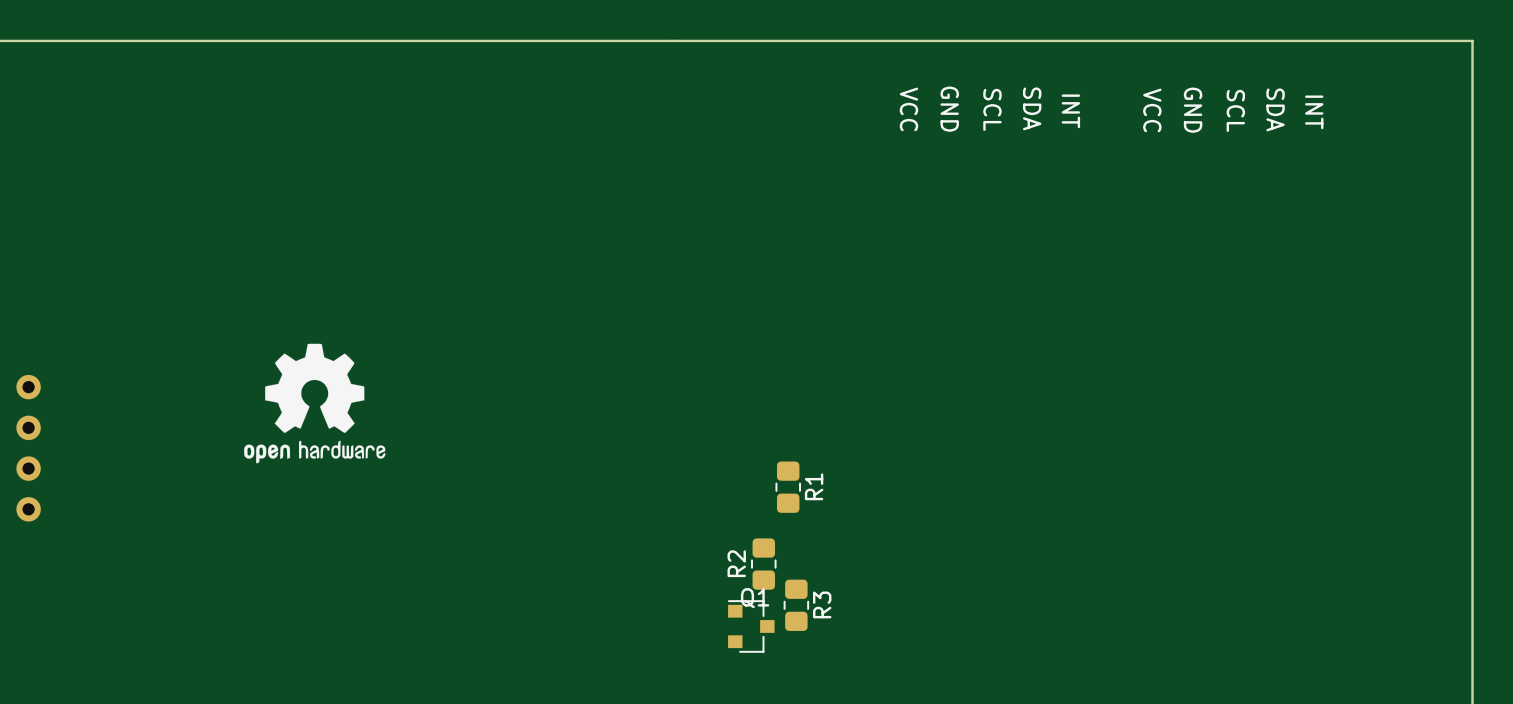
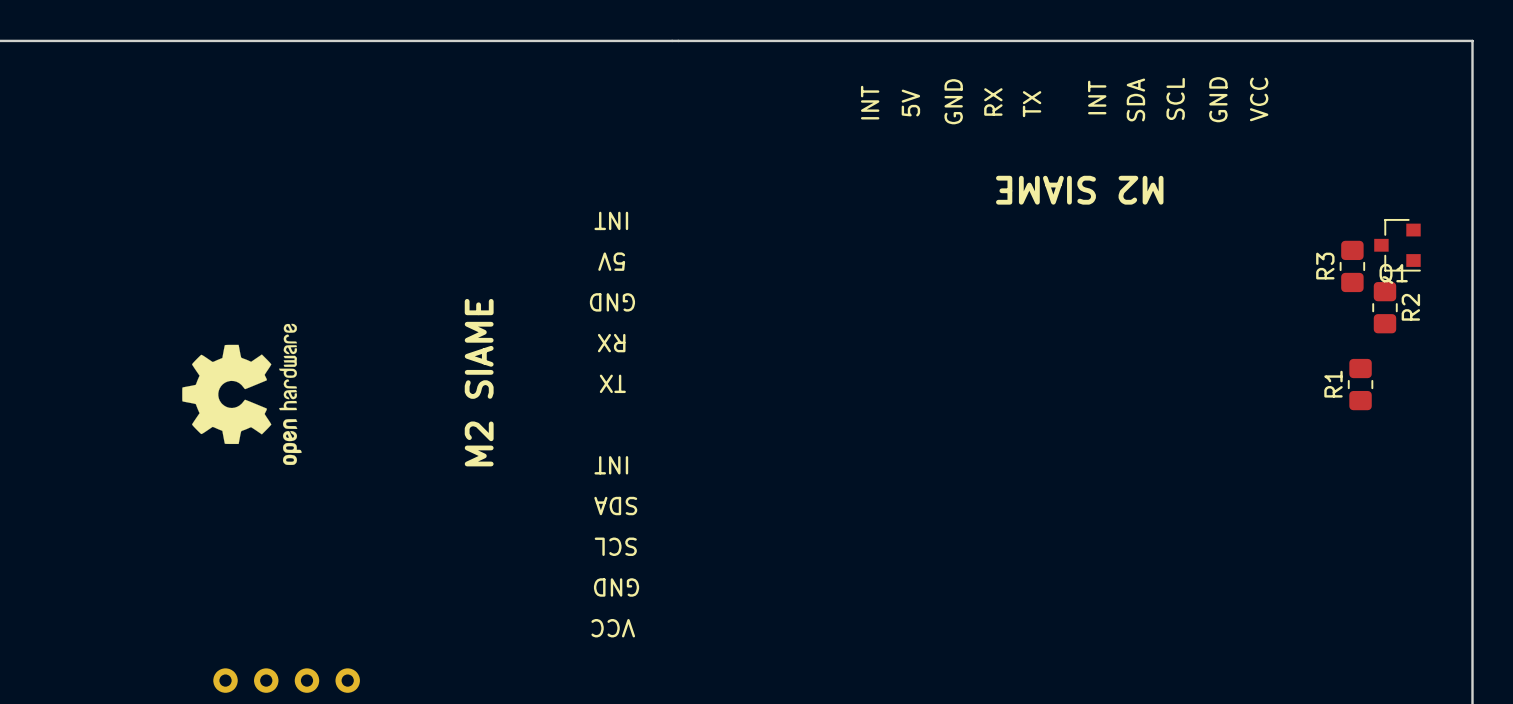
text: none -> SDA (1135, 99)
text: none -> INT (870, 102)
text: SDA (1032, 108) -> TX (1032, 104)
text: VCC (908, 109) -> 5V (910, 103)
text rotation: 0° (949, 109) -> 180° (953, 101)
text: SCL (992, 109) -> RX (993, 101)
text: SDA (1275, 109) -> none
text rotation: 0° (1152, 110) -> 180° (1259, 99)
text position: VCC (1152, 110) -> VCC (1259, 99)
text rotation: 0° (1193, 110) -> 180° (1218, 99)
text rotation: 0° (1235, 110) -> 180° (1175, 98)
text position: SCL (1235, 110) -> SCL (1175, 98)
text rotation: 0° (1070, 111) -> 180° (1097, 97)
text: INT (1314, 112) -> none
text: none -> M2 SIAME (1079, 190)
text: none -> INT (611, 220)
text: none -> 5V (611, 261)
text: none -> GND (612, 302)
drawing: none -> [182, 323, 302, 466]
drawing: [244, 343, 386, 464] -> none
text: none -> RX (611, 343)
text: none -> M2 SIAME (479, 382)
text: none -> TX (612, 383)
part rotation: 0° (28, 448) -> 90° clockwise (286, 680)
part position: (28, 448) -> (286, 680)
text: none -> INT (611, 465)
R1 name position: R1 (814, 486) -> R1 (1333, 384)
R1 position: (788, 487) -> (1360, 384)
text: none -> SDA (615, 506)
text: none -> SCL (615, 546)
R2 name position: R2 (736, 563) -> R2 (1410, 307)
R2 position: (763, 564) -> (1384, 307)
text: none -> GND (616, 587)
R3 name position: R3 (822, 604) -> R3 (1325, 266)
R3 position: (796, 605) -> (1352, 266)
Q1 rotation: 0° (751, 626) -> 180° (1397, 245)
Q1 position: (751, 626) -> (1397, 245)
text: none -> VCC (613, 628)

